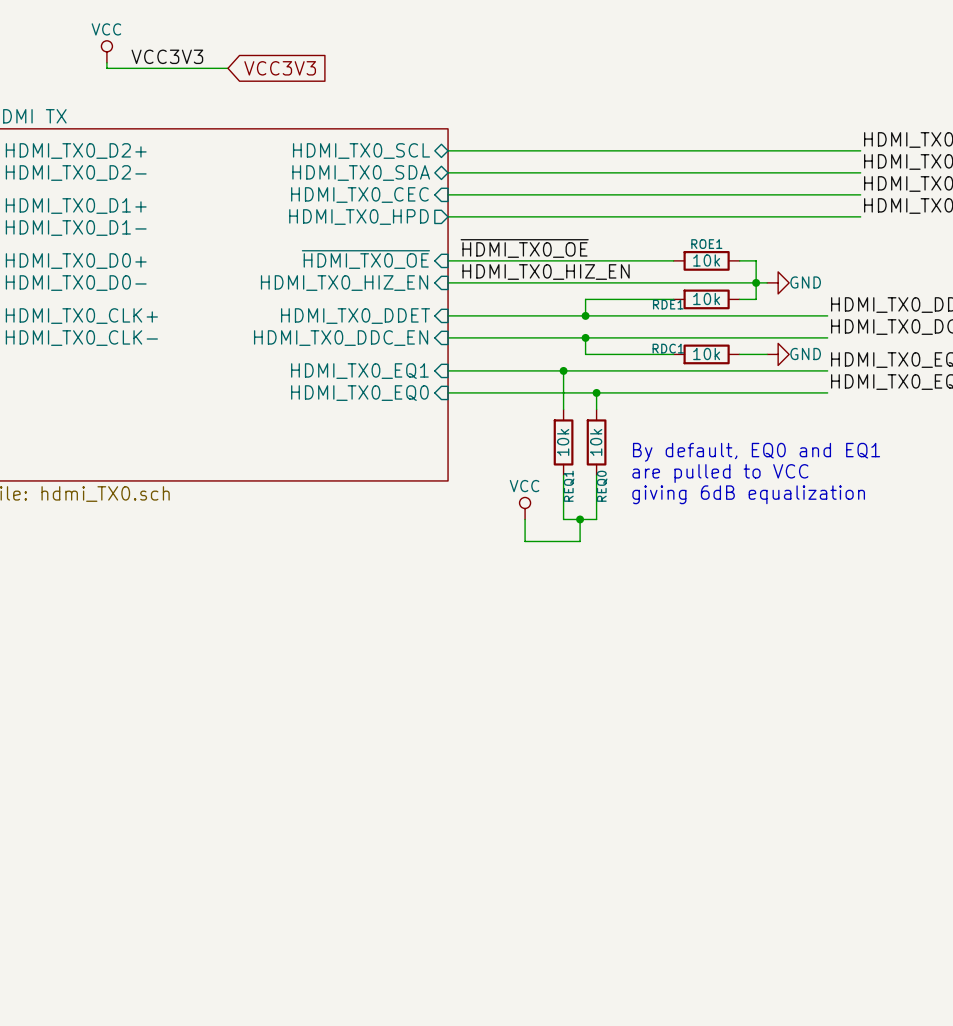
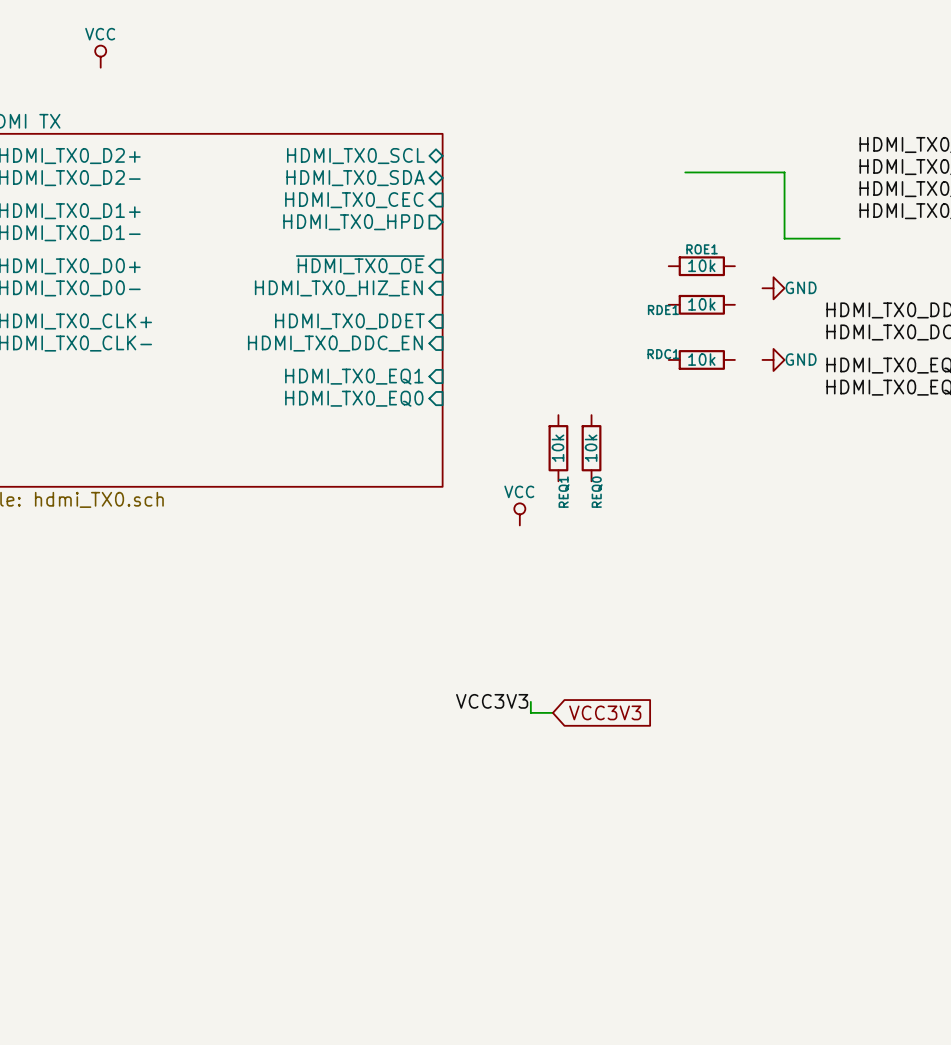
label: VCC3V3 (167, 56) -> none
wire: (106, 62) (106, 68) (227, 68) -> none
global label: VCC3V3 (280, 68) -> none
wire: (448, 150) (860, 150) -> none
wire: none -> (685, 172) (784, 172) (784, 238) (839, 238)
wire: (448, 172) (860, 172) -> none
wire: (448, 194) (860, 194) -> none
wire: (448, 216) (860, 216) -> none
label: ~{HDMI_TX0_OE} (524, 248) -> none
wire: (448, 260) (673, 260) -> none
wire: (739, 260) (756, 260) (756, 299) (739, 299) -> none
label: HDMI_TX0_HIZ_EN (546, 272) -> none
wire: (448, 282) (767, 282) -> none
junction: (756, 282) -> none
wire: (673, 299) (585, 299) (585, 315) -> none
wire: (448, 315) (827, 315) -> none
junction: (585, 315) -> none
wire: (448, 337) (827, 337) -> none
wire: (585, 337) (585, 354) (673, 354) -> none
junction: (585, 337) -> none
wire: (739, 354) (767, 354) -> none
wire: (448, 370) (827, 370) -> none
wire: (563, 370) (563, 409) -> none
junction: (563, 370) -> none
wire: (448, 392) (827, 392) -> none
wire: (596, 392) (596, 409) -> none
junction: (596, 392) -> none
text: By default, EQ0 and EQ1 (756, 452) -> none
text: are pulled to VCC (720, 473) -> none
wire: (563, 475) (563, 519) (596, 519) (596, 475) -> none
text: giving 6dB equalization (748, 494) -> none
wire: (525, 519) (525, 541) (580, 541) (580, 519) -> none
junction: (580, 519) -> none
label: none -> VCC3V3 (492, 701)
wire: none -> (530, 701) (530, 712) (552, 712)
global label: none -> VCC3V3 (605, 712)

